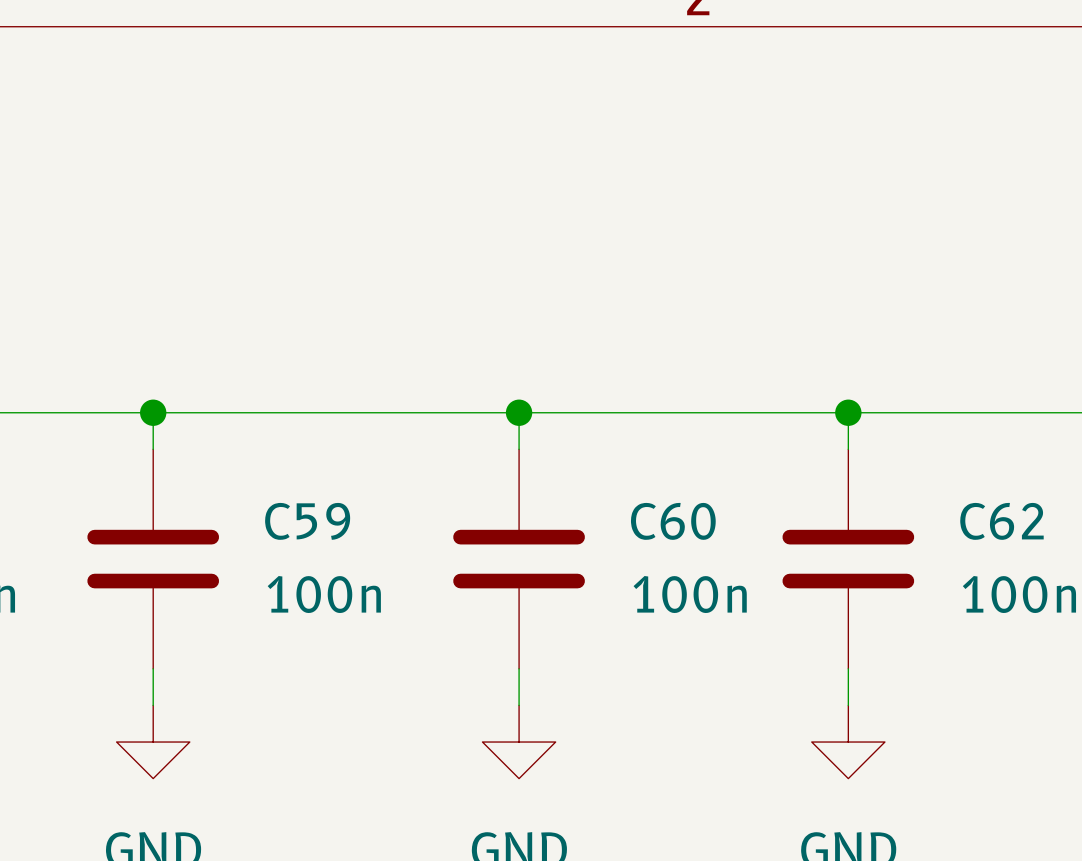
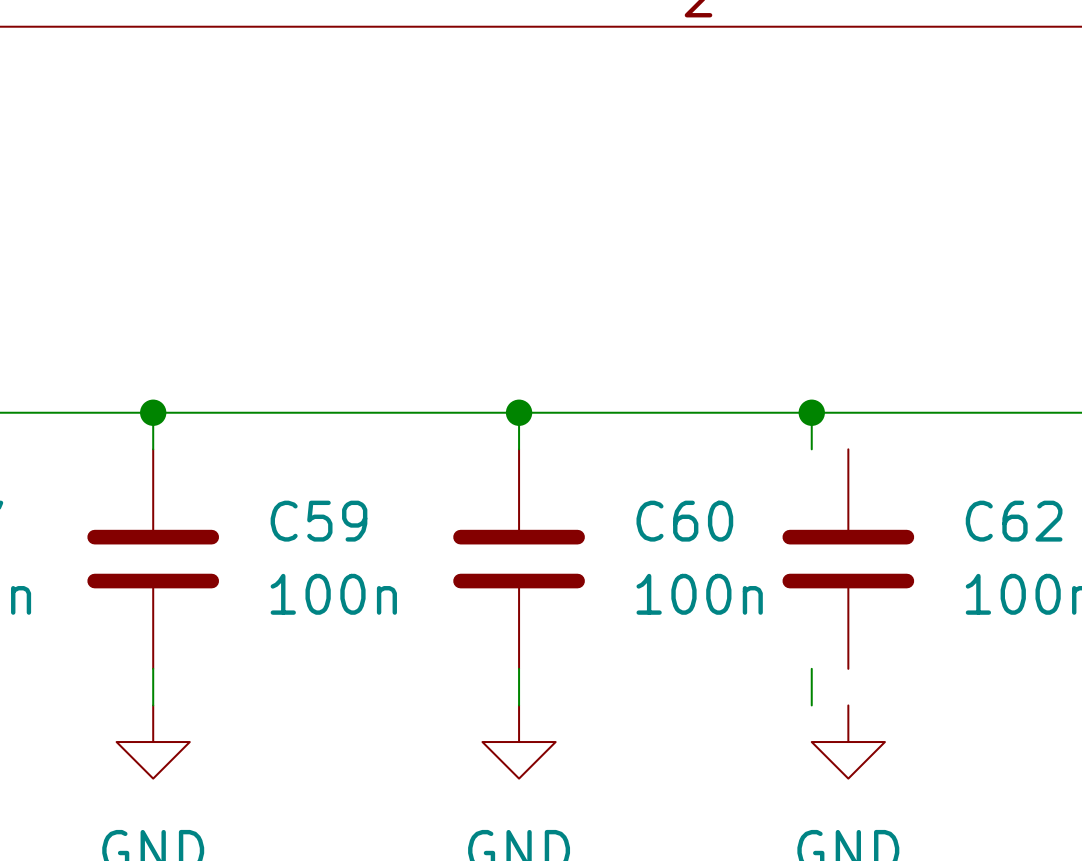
wire: (848, 412) (848, 449) -> (811, 412) (811, 449)
junction position: (848, 412) -> (811, 412)
wire: (848, 668) (848, 705) -> (811, 668) (811, 705)

